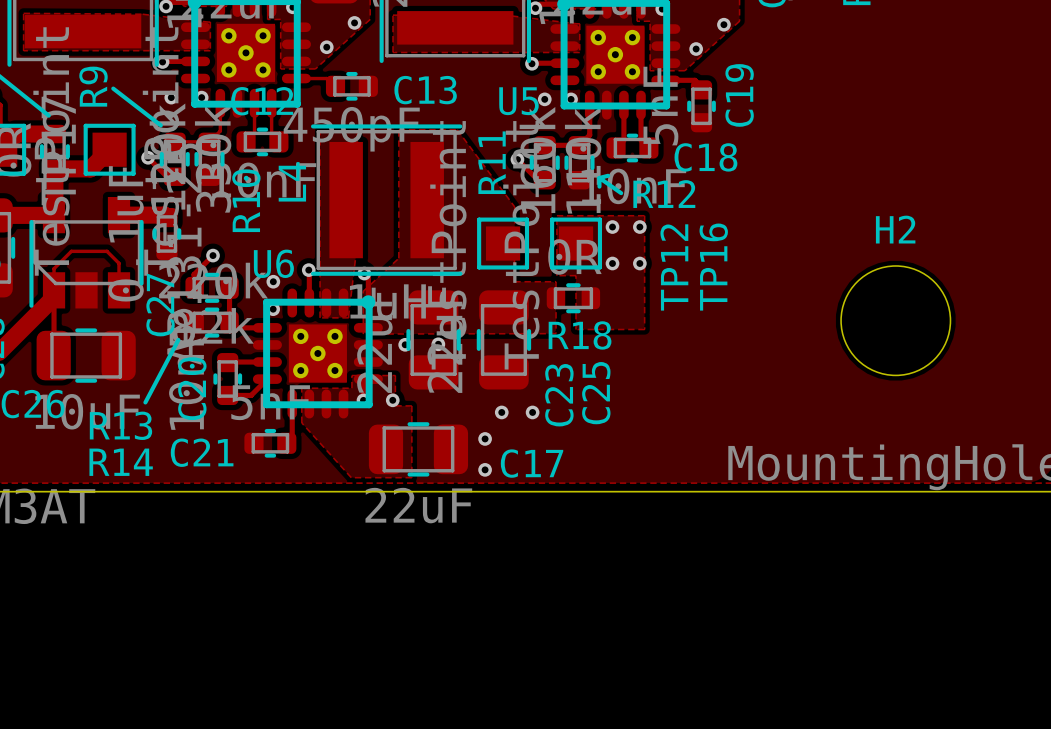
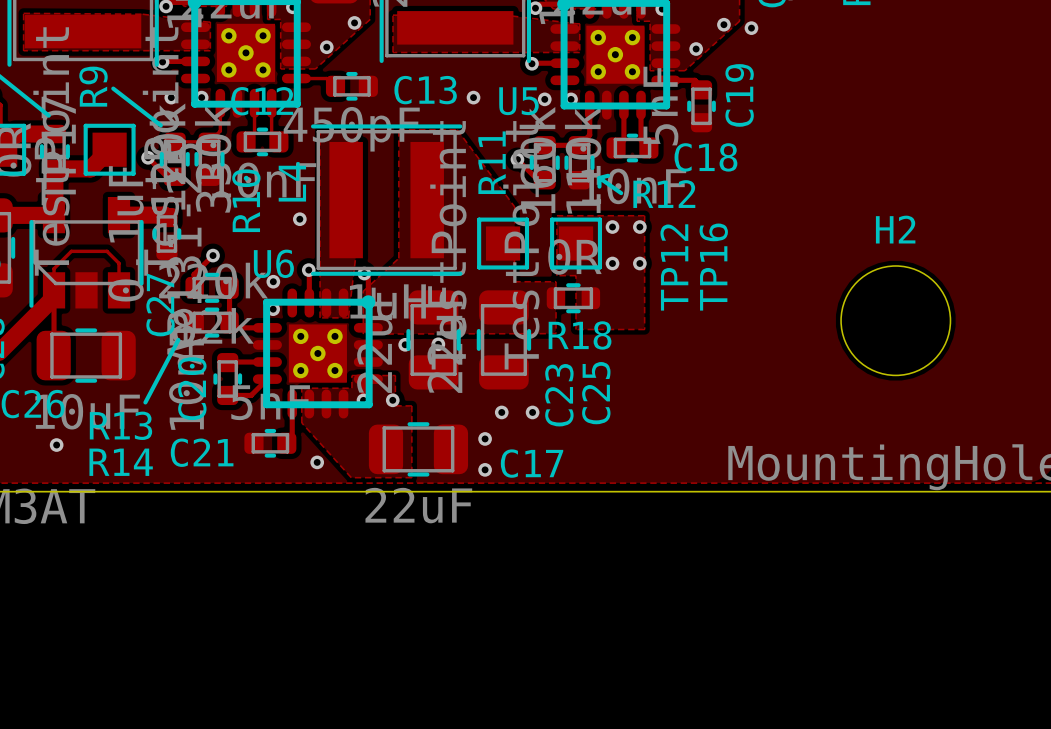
via: none -> (751, 28)
via: none -> (473, 97)
via: none -> (299, 219)
via: none -> (56, 445)
via: none -> (317, 462)

